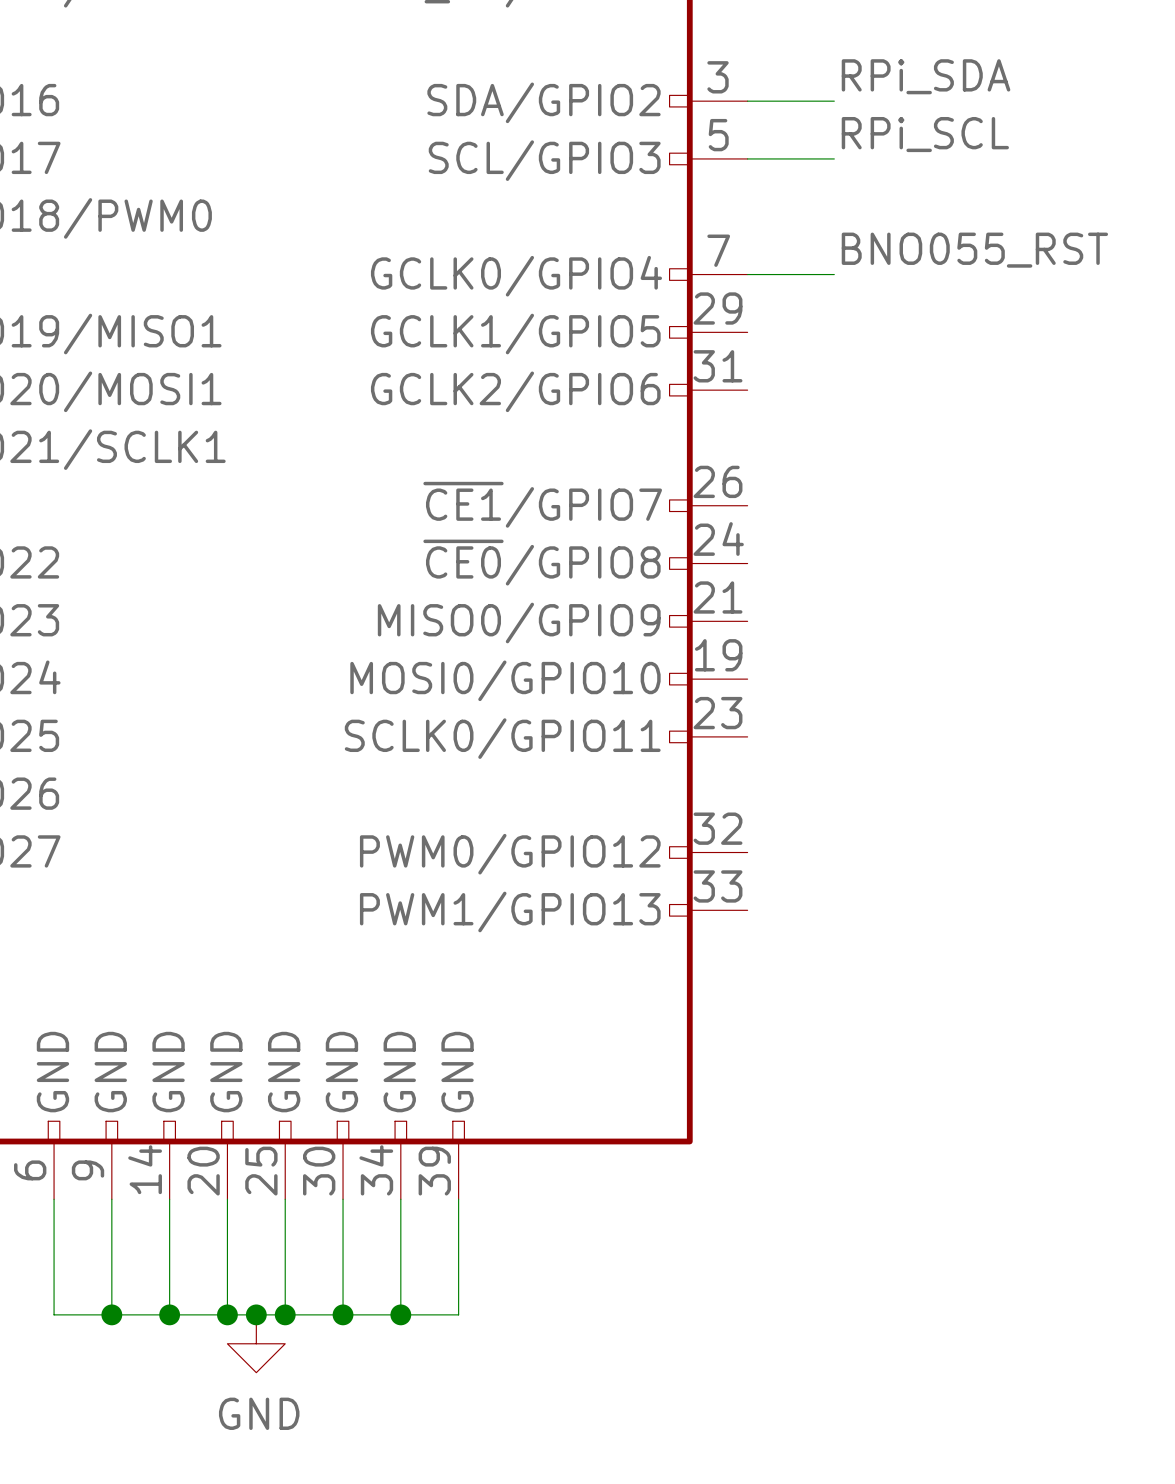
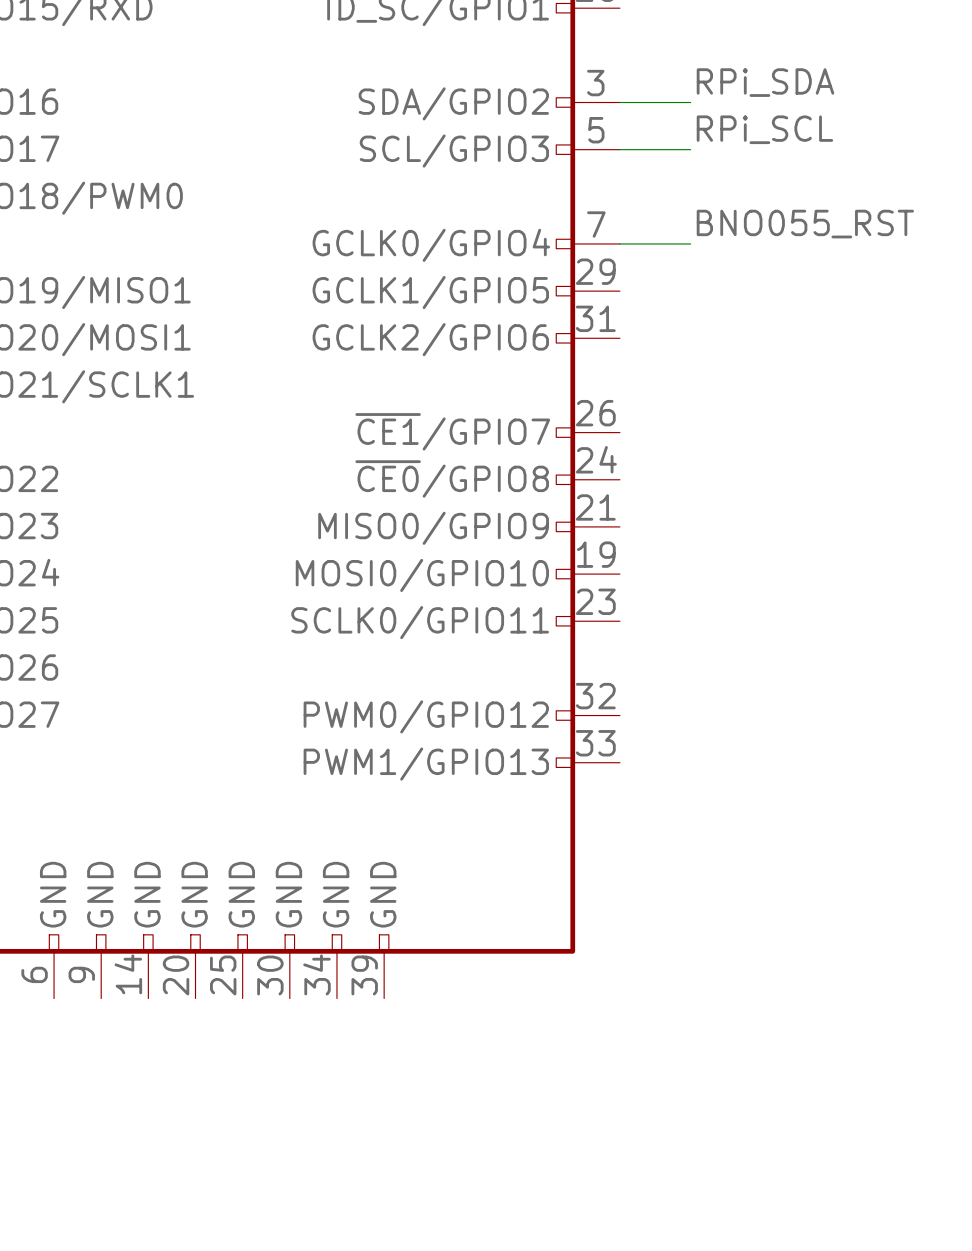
wire: (54, 1199) (54, 1314) (458, 1314) (458, 1199) -> none
wire: (111, 1199) (111, 1314) -> none
wire: (169, 1199) (169, 1314) -> none
wire: (227, 1199) (227, 1314) -> none
wire: (285, 1199) (285, 1314) -> none
wire: (343, 1199) (343, 1314) -> none
wire: (400, 1199) (400, 1314) -> none
junction: (111, 1314) -> none
junction: (169, 1314) -> none
junction: (227, 1314) -> none
junction: (256, 1314) -> none
junction: (285, 1314) -> none
junction: (343, 1314) -> none
junction: (400, 1314) -> none
power symbol: GND (256, 1343) -> none

